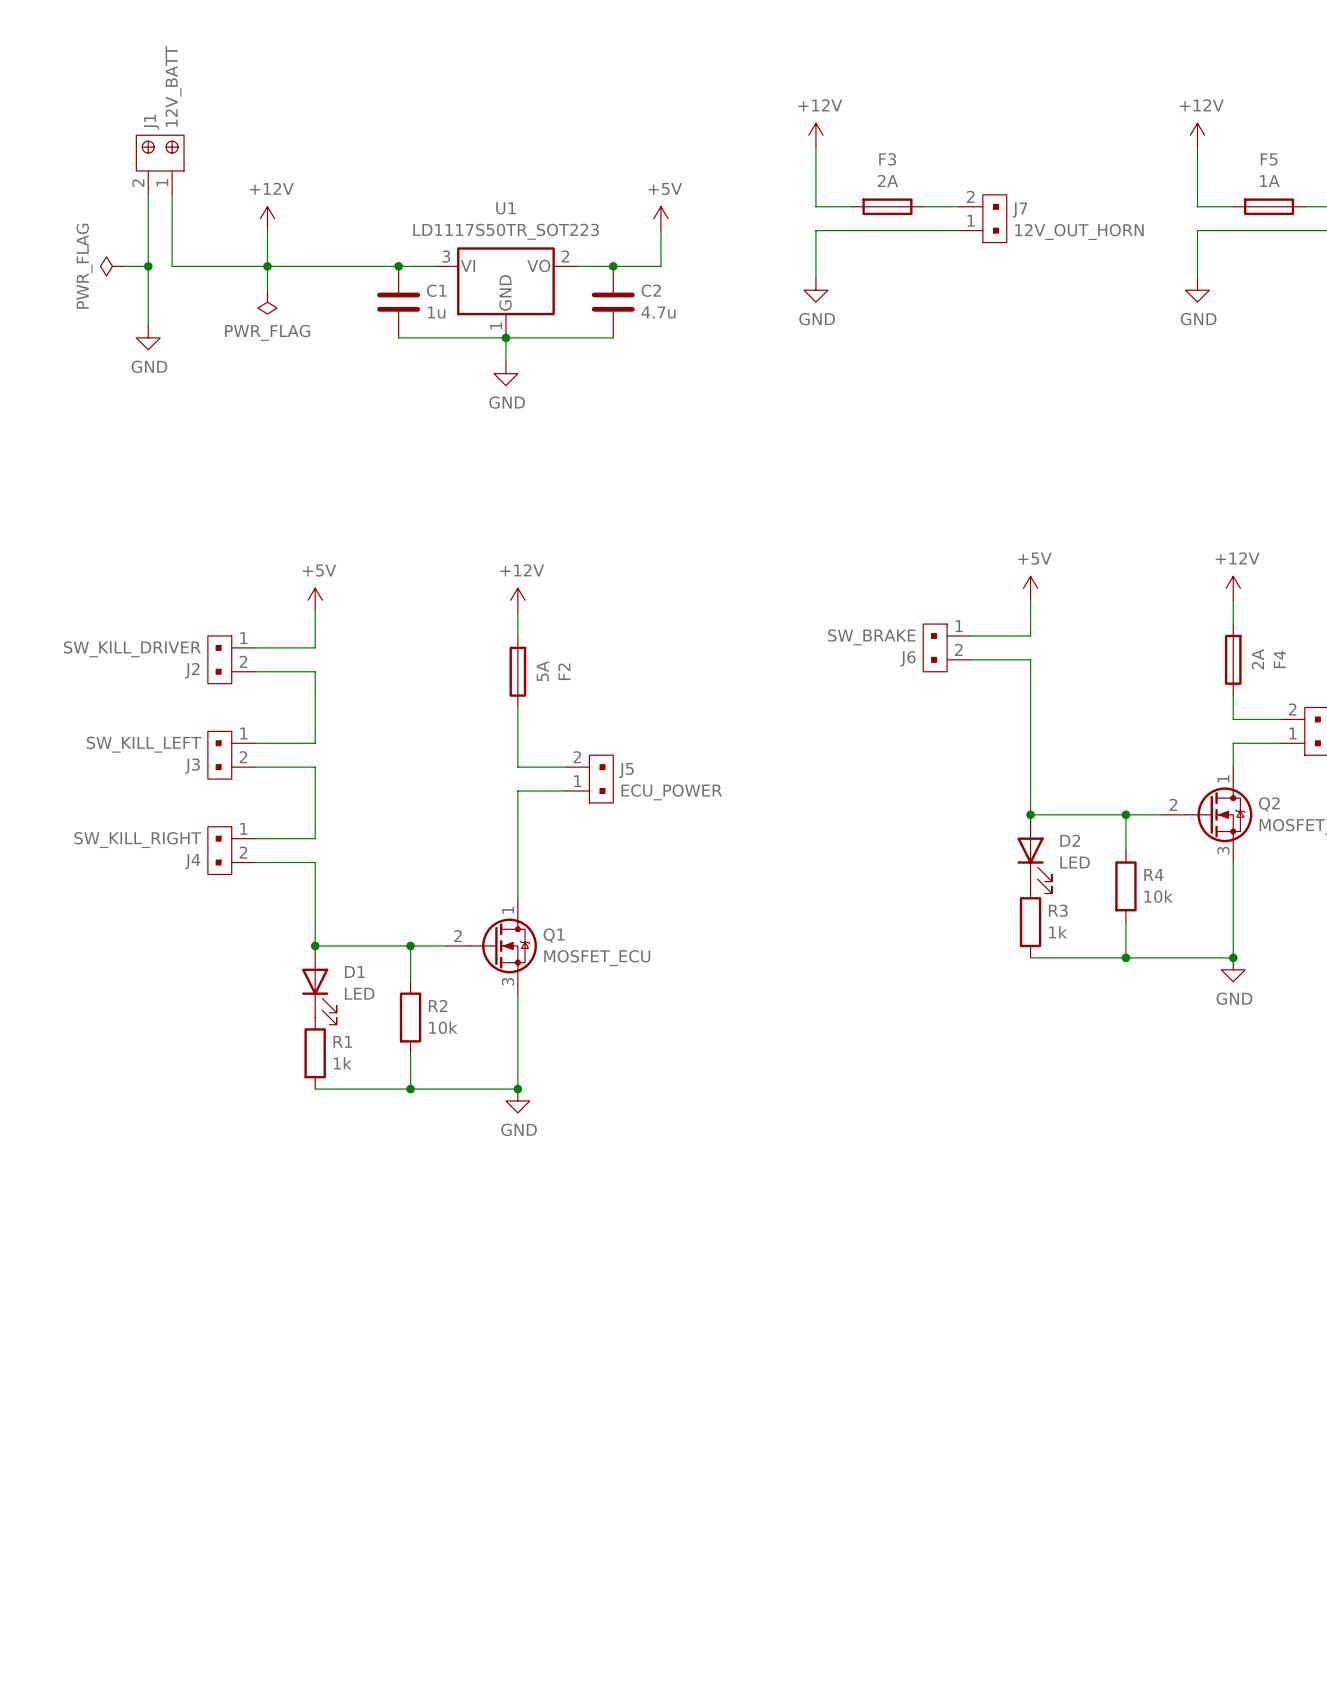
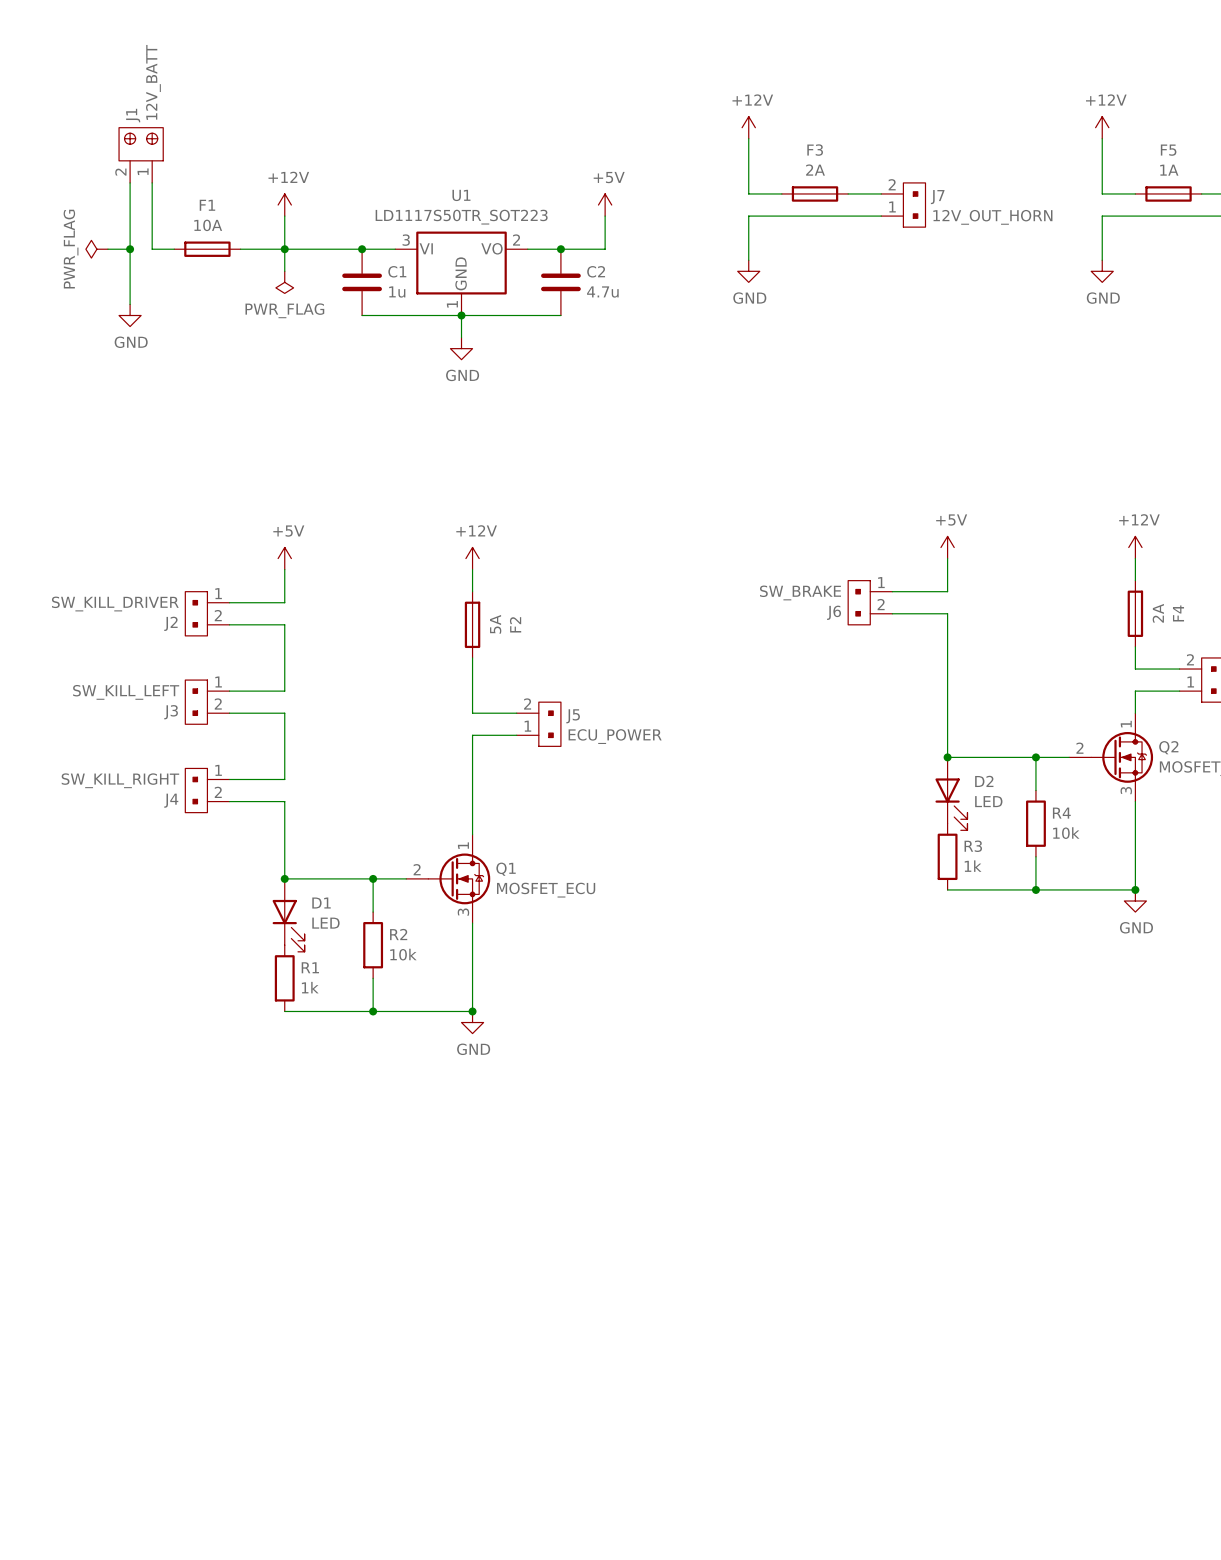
power symbol position: +12V (267, 218) -> +12V (284, 205)
wire: (267, 230) (267, 290) -> (284, 216) (284, 271)
F1: none -> 10A (207, 249)
junction position: (267, 266) -> (284, 249)
power symbol position: PWR_FLAG (267, 302) -> PWR_FLAG (284, 282)

